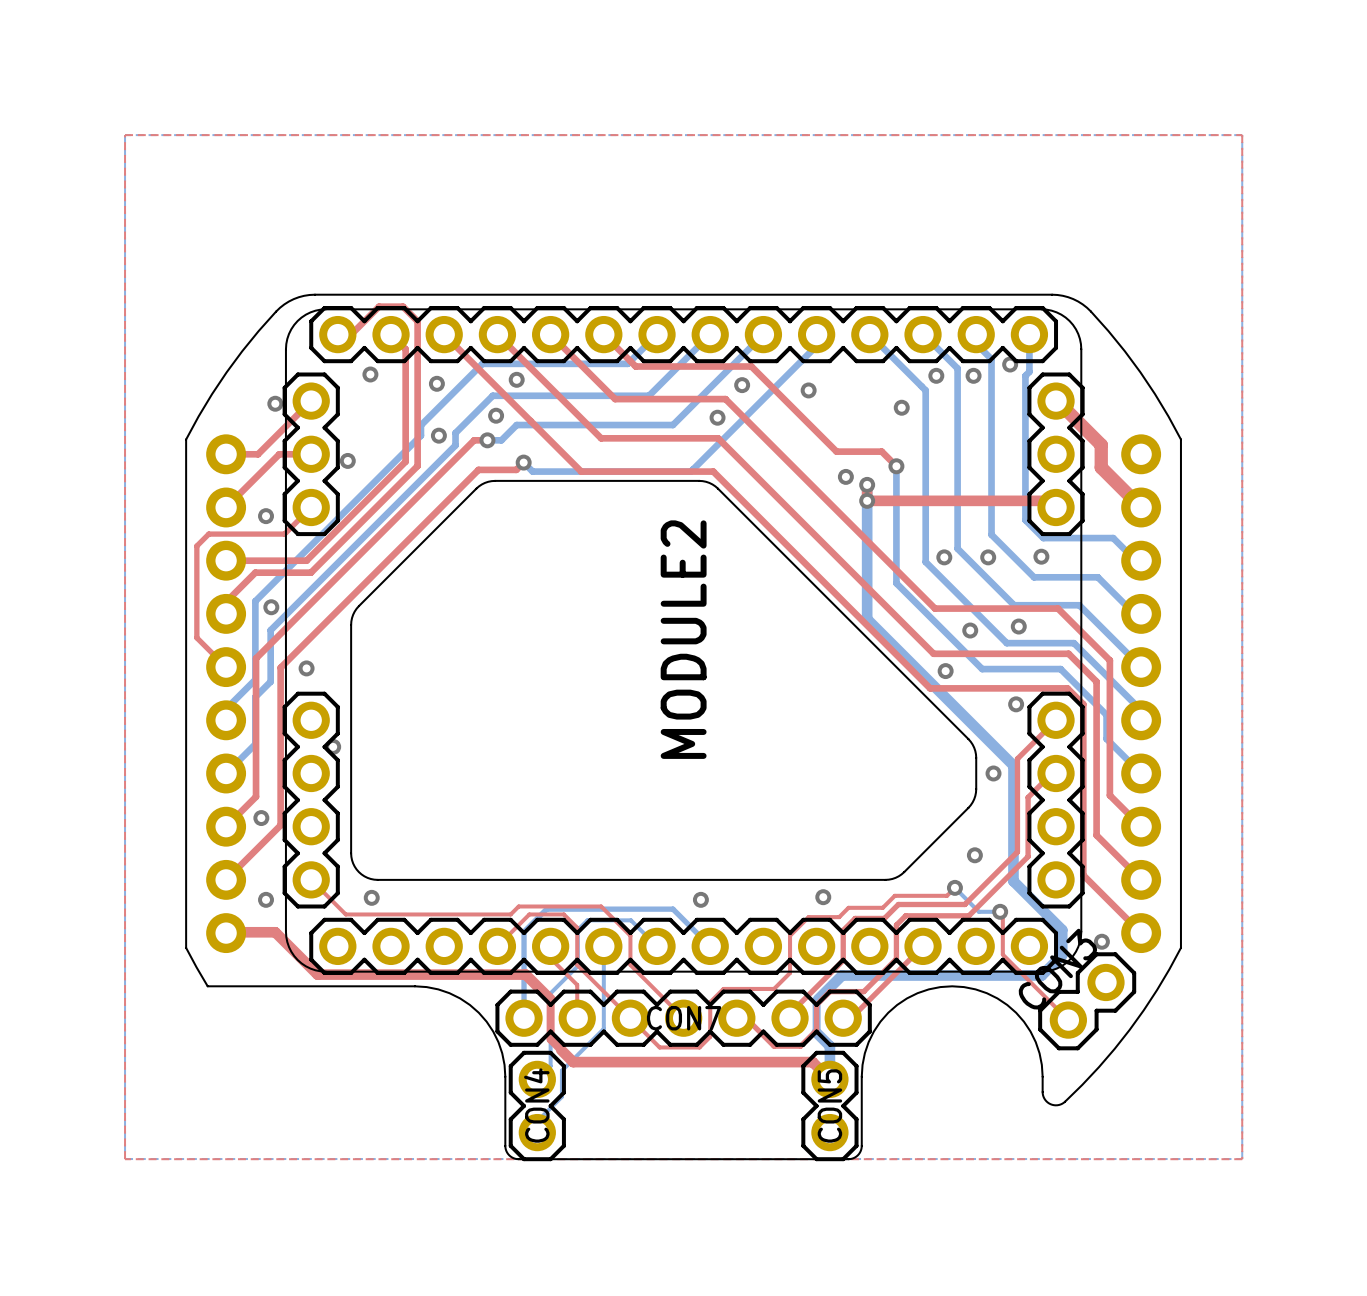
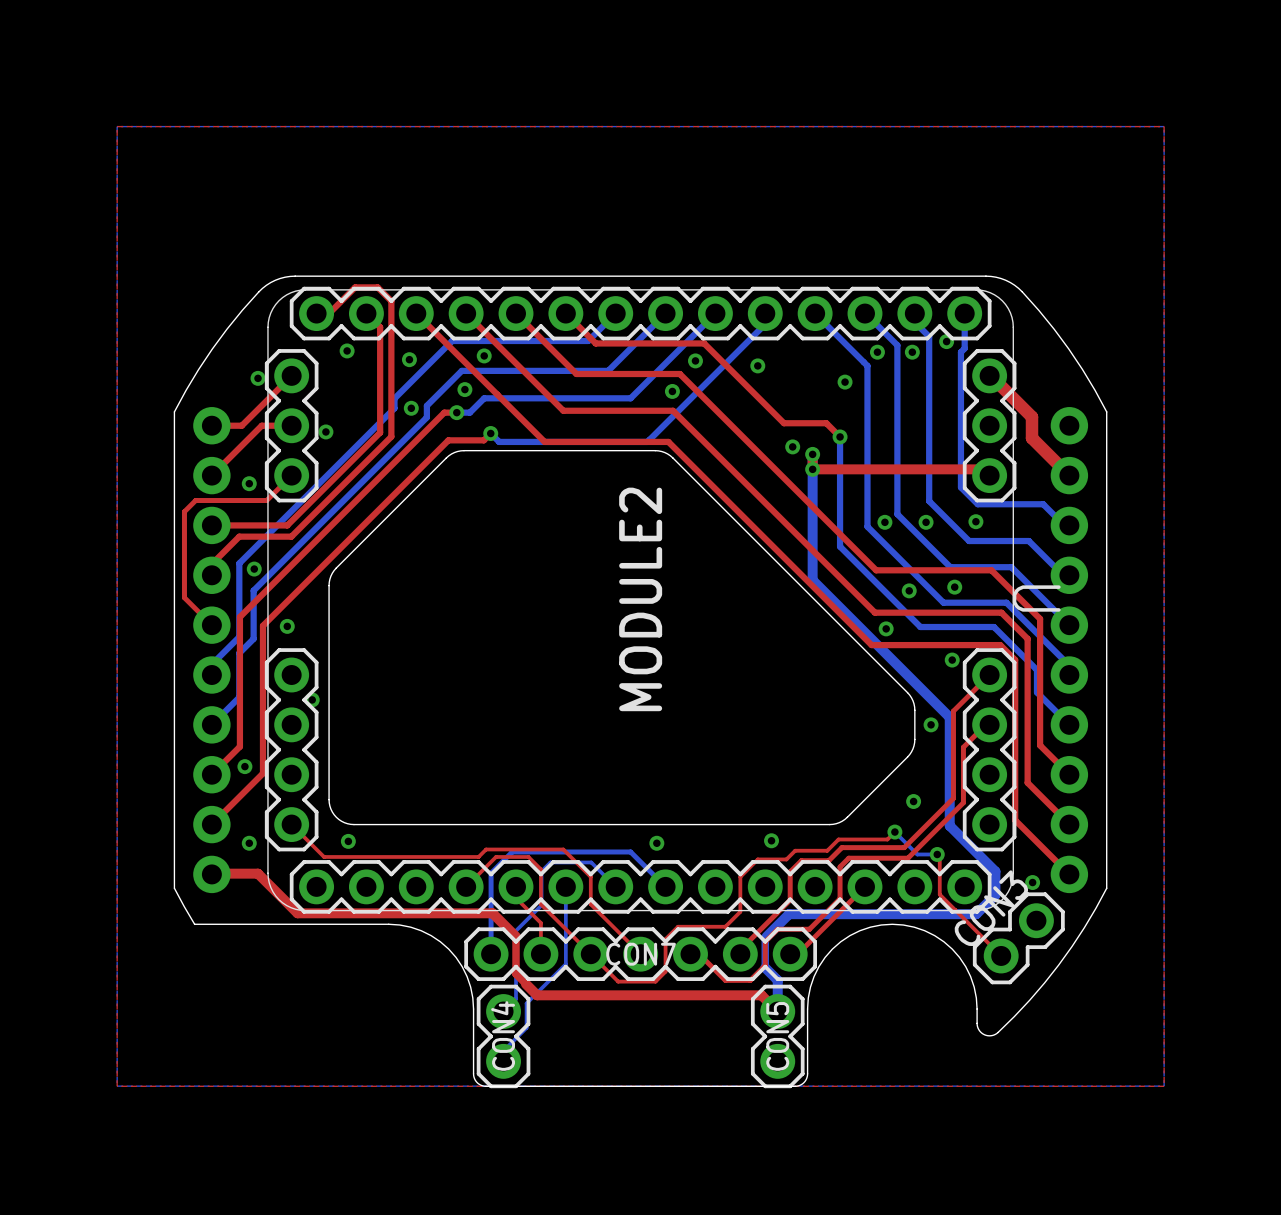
text: none -> U (1036, 598)

